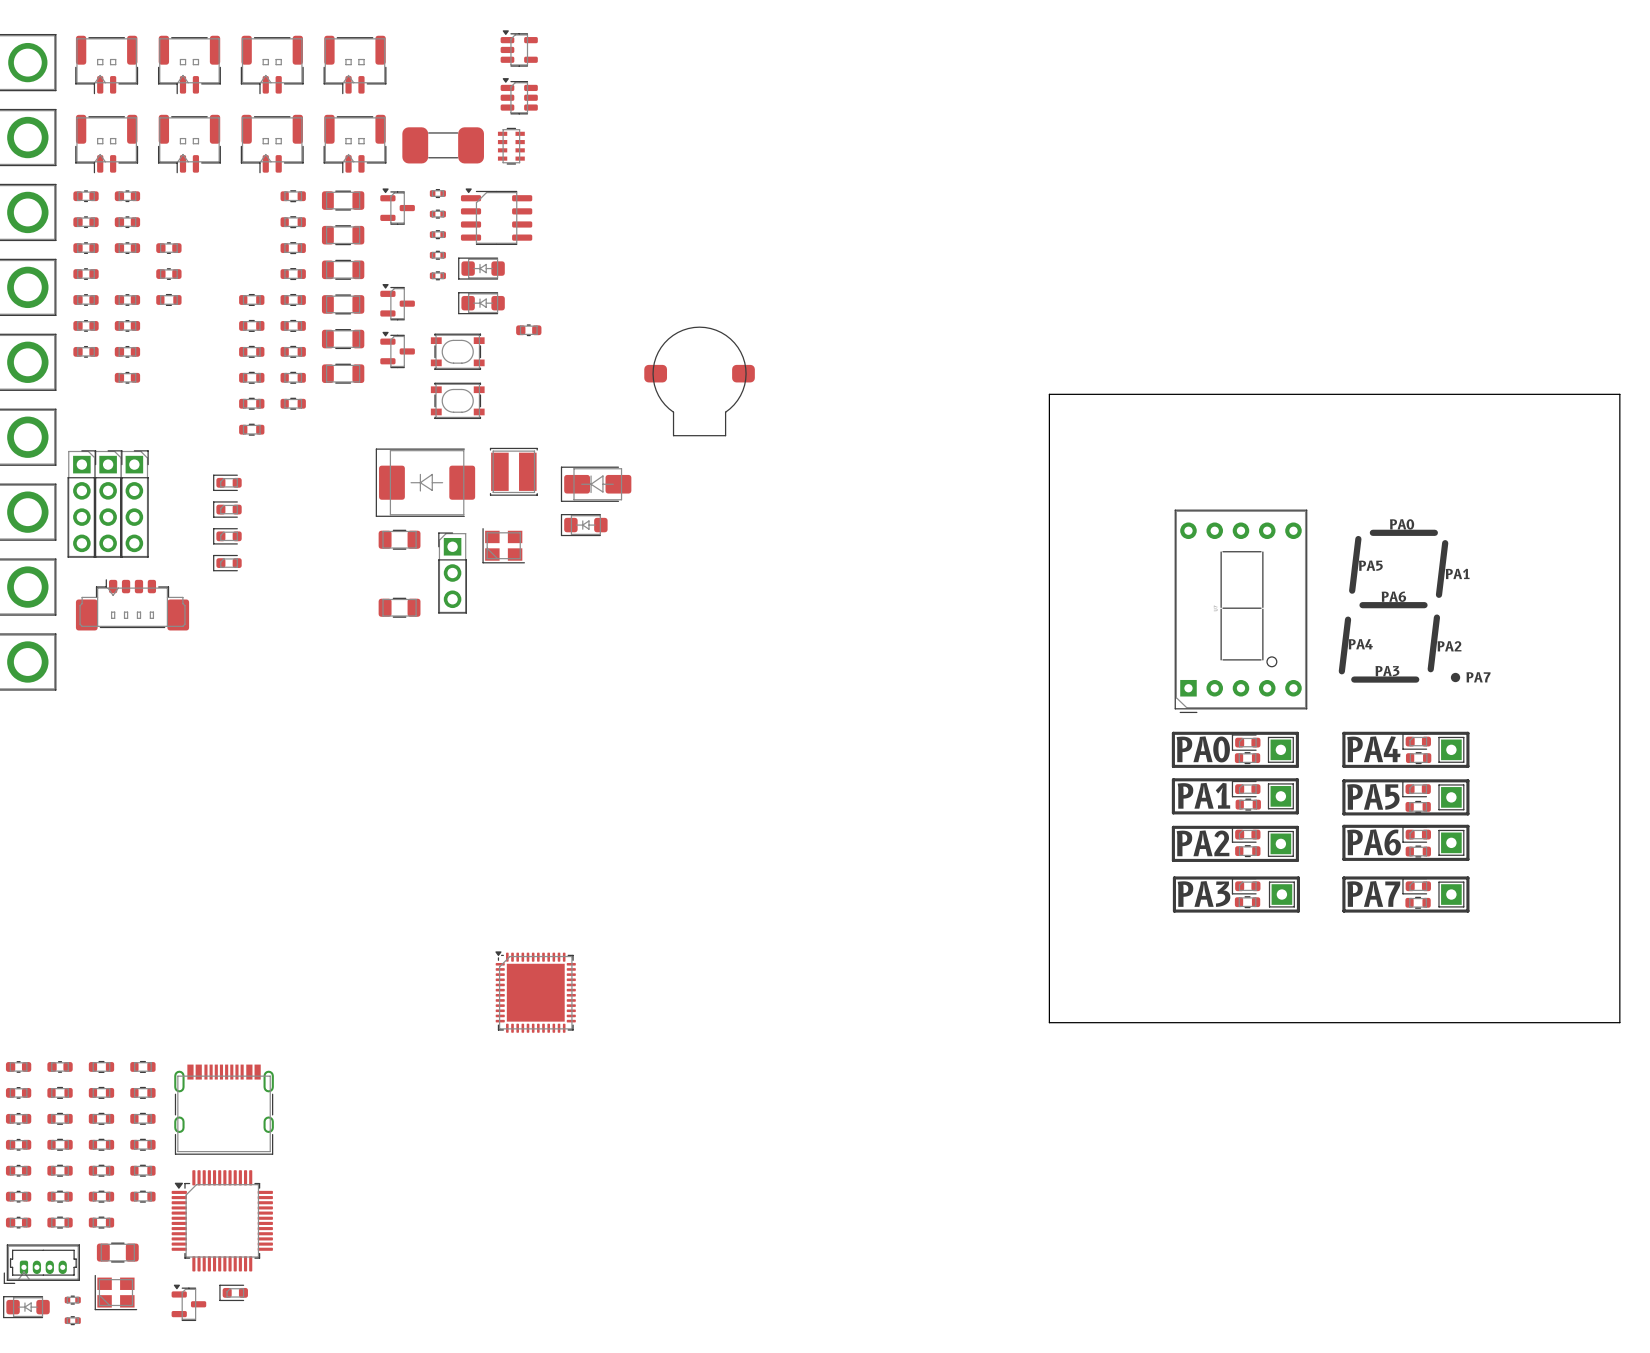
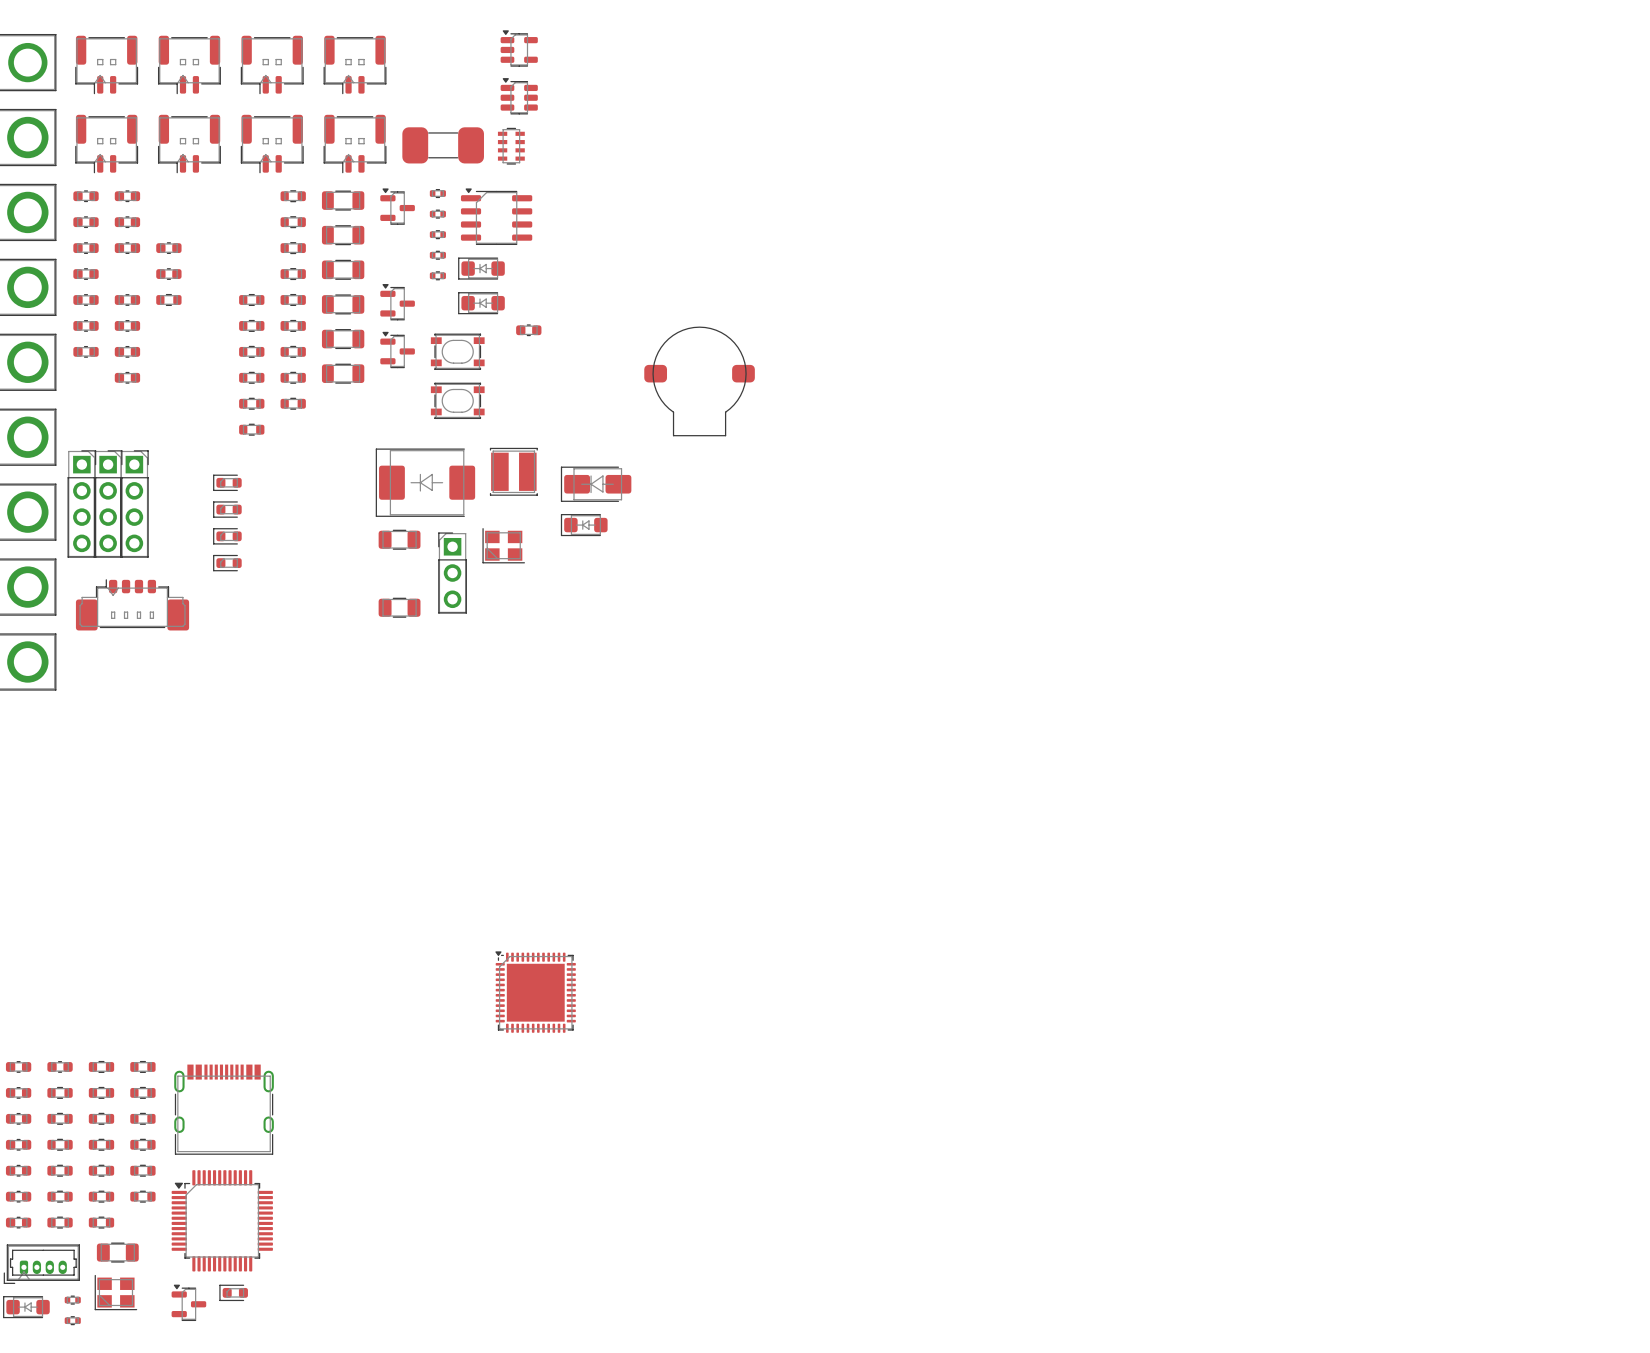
board edge: (1049, 394) (1619, 394) (1619, 1022) (1049, 1022) (1049, 394) -> none
text: PA0 (1402, 524) -> none
line: (1372, 532) (1434, 532) -> none
line: (1358, 539) (1352, 590) -> none
line: (1445, 543) (1438, 594) -> none
text: PA5 (1370, 565) -> none
text: PA1 (1457, 573) -> none
text: PA6 (1393, 596) -> none
line: (1362, 605) (1424, 605) -> none
part: (1240, 611) -> none
line: (1436, 617) (1430, 669) -> none
line: (1348, 619) (1341, 671) -> none
text: PA4 (1360, 644) -> none
text: PA2 (1449, 646) -> none
text: PA3 (1387, 671) -> none
drawing: [1450, 672, 1461, 683] -> none
text: PA7 (1478, 677) -> none
line: (1354, 679) (1416, 679) -> none
line: (1173, 733) (1297, 733) (1297, 766) (1173, 766) (1173, 733) -> none
line: (1343, 733) (1343, 766) (1467, 766) (1467, 733) (1343, 733) -> none
part: (1416, 741) -> none
part: (1246, 742) -> none
text: PA0 (1203, 749) -> none
part: (1280, 749) -> none
text: PA4 (1373, 749) -> none
part: (1451, 749) -> none
part: (1247, 758) -> none
part: (1418, 758) -> none
line: (1173, 779) (1173, 812) (1297, 812) (1297, 779) (1173, 779) -> none
line: (1343, 780) (1343, 813) (1467, 813) (1467, 780) (1343, 780) -> none
part: (1246, 789) -> none
part: (1416, 789) -> none
text: PA1 (1203, 795) -> none
part: (1280, 796) -> none
text: PA5 (1373, 796) -> none
part: (1451, 797) -> none
part: (1248, 804) -> none
part: (1418, 806) -> none
line: (1343, 826) (1467, 826) (1467, 859) (1343, 859) (1343, 826) -> none
line: (1173, 827) (1173, 860) (1297, 860) (1297, 827) (1173, 827) -> none
part: (1246, 834) -> none
part: (1416, 834) -> none
text: PA6 (1374, 842) -> none
part: (1451, 842) -> none
text: PA2 (1203, 843) -> none
part: (1280, 843) -> none
part: (1247, 851) -> none
part: (1418, 851) -> none
line: (1174, 877) (1298, 877) (1298, 911) (1174, 911) (1174, 877) -> none
line: (1343, 877) (1343, 911) (1467, 911) (1467, 877) (1343, 877) -> none
part: (1246, 886) -> none
part: (1416, 886) -> none
text: PA3 (1204, 893) -> none
text: PA7 (1373, 893) -> none
part: (1281, 894) -> none
part: (1451, 894) -> none
part: (1247, 902) -> none
part: (1418, 902) -> none

